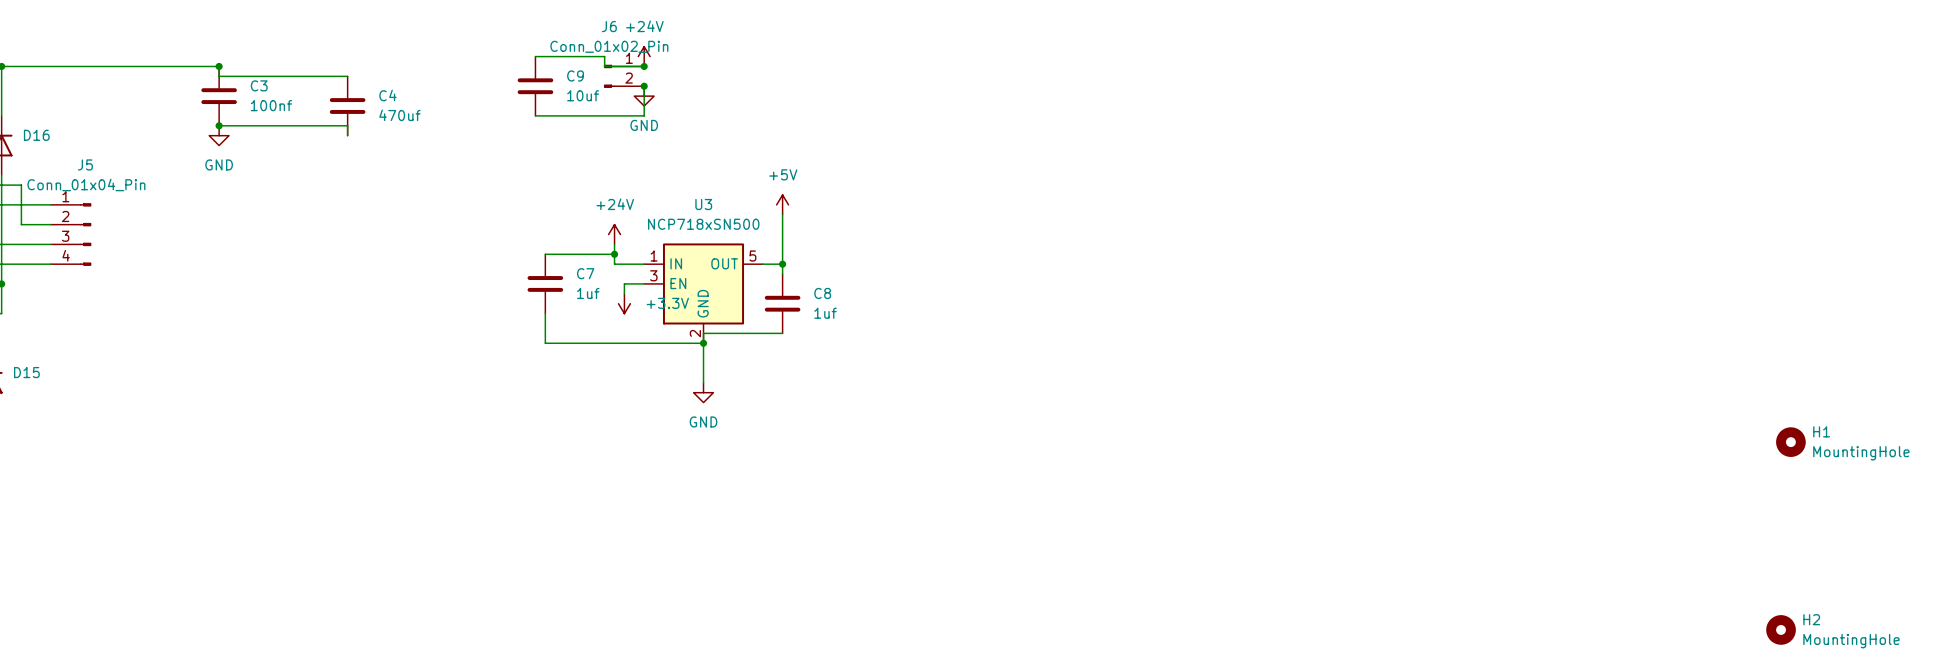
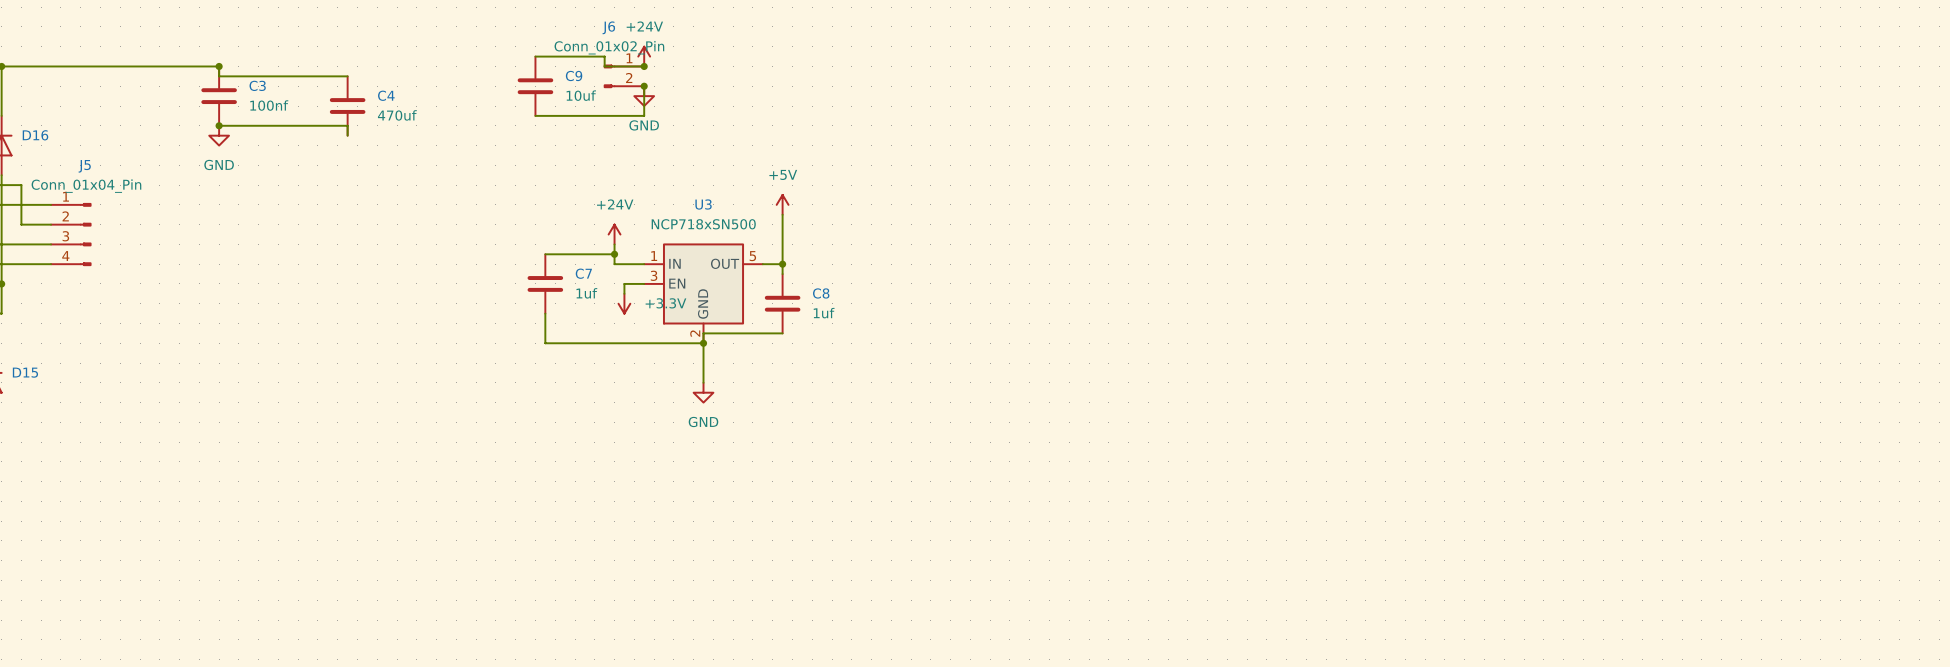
H1: MountingHole (1790, 442) -> none
H2: MountingHole (1781, 629) -> none

